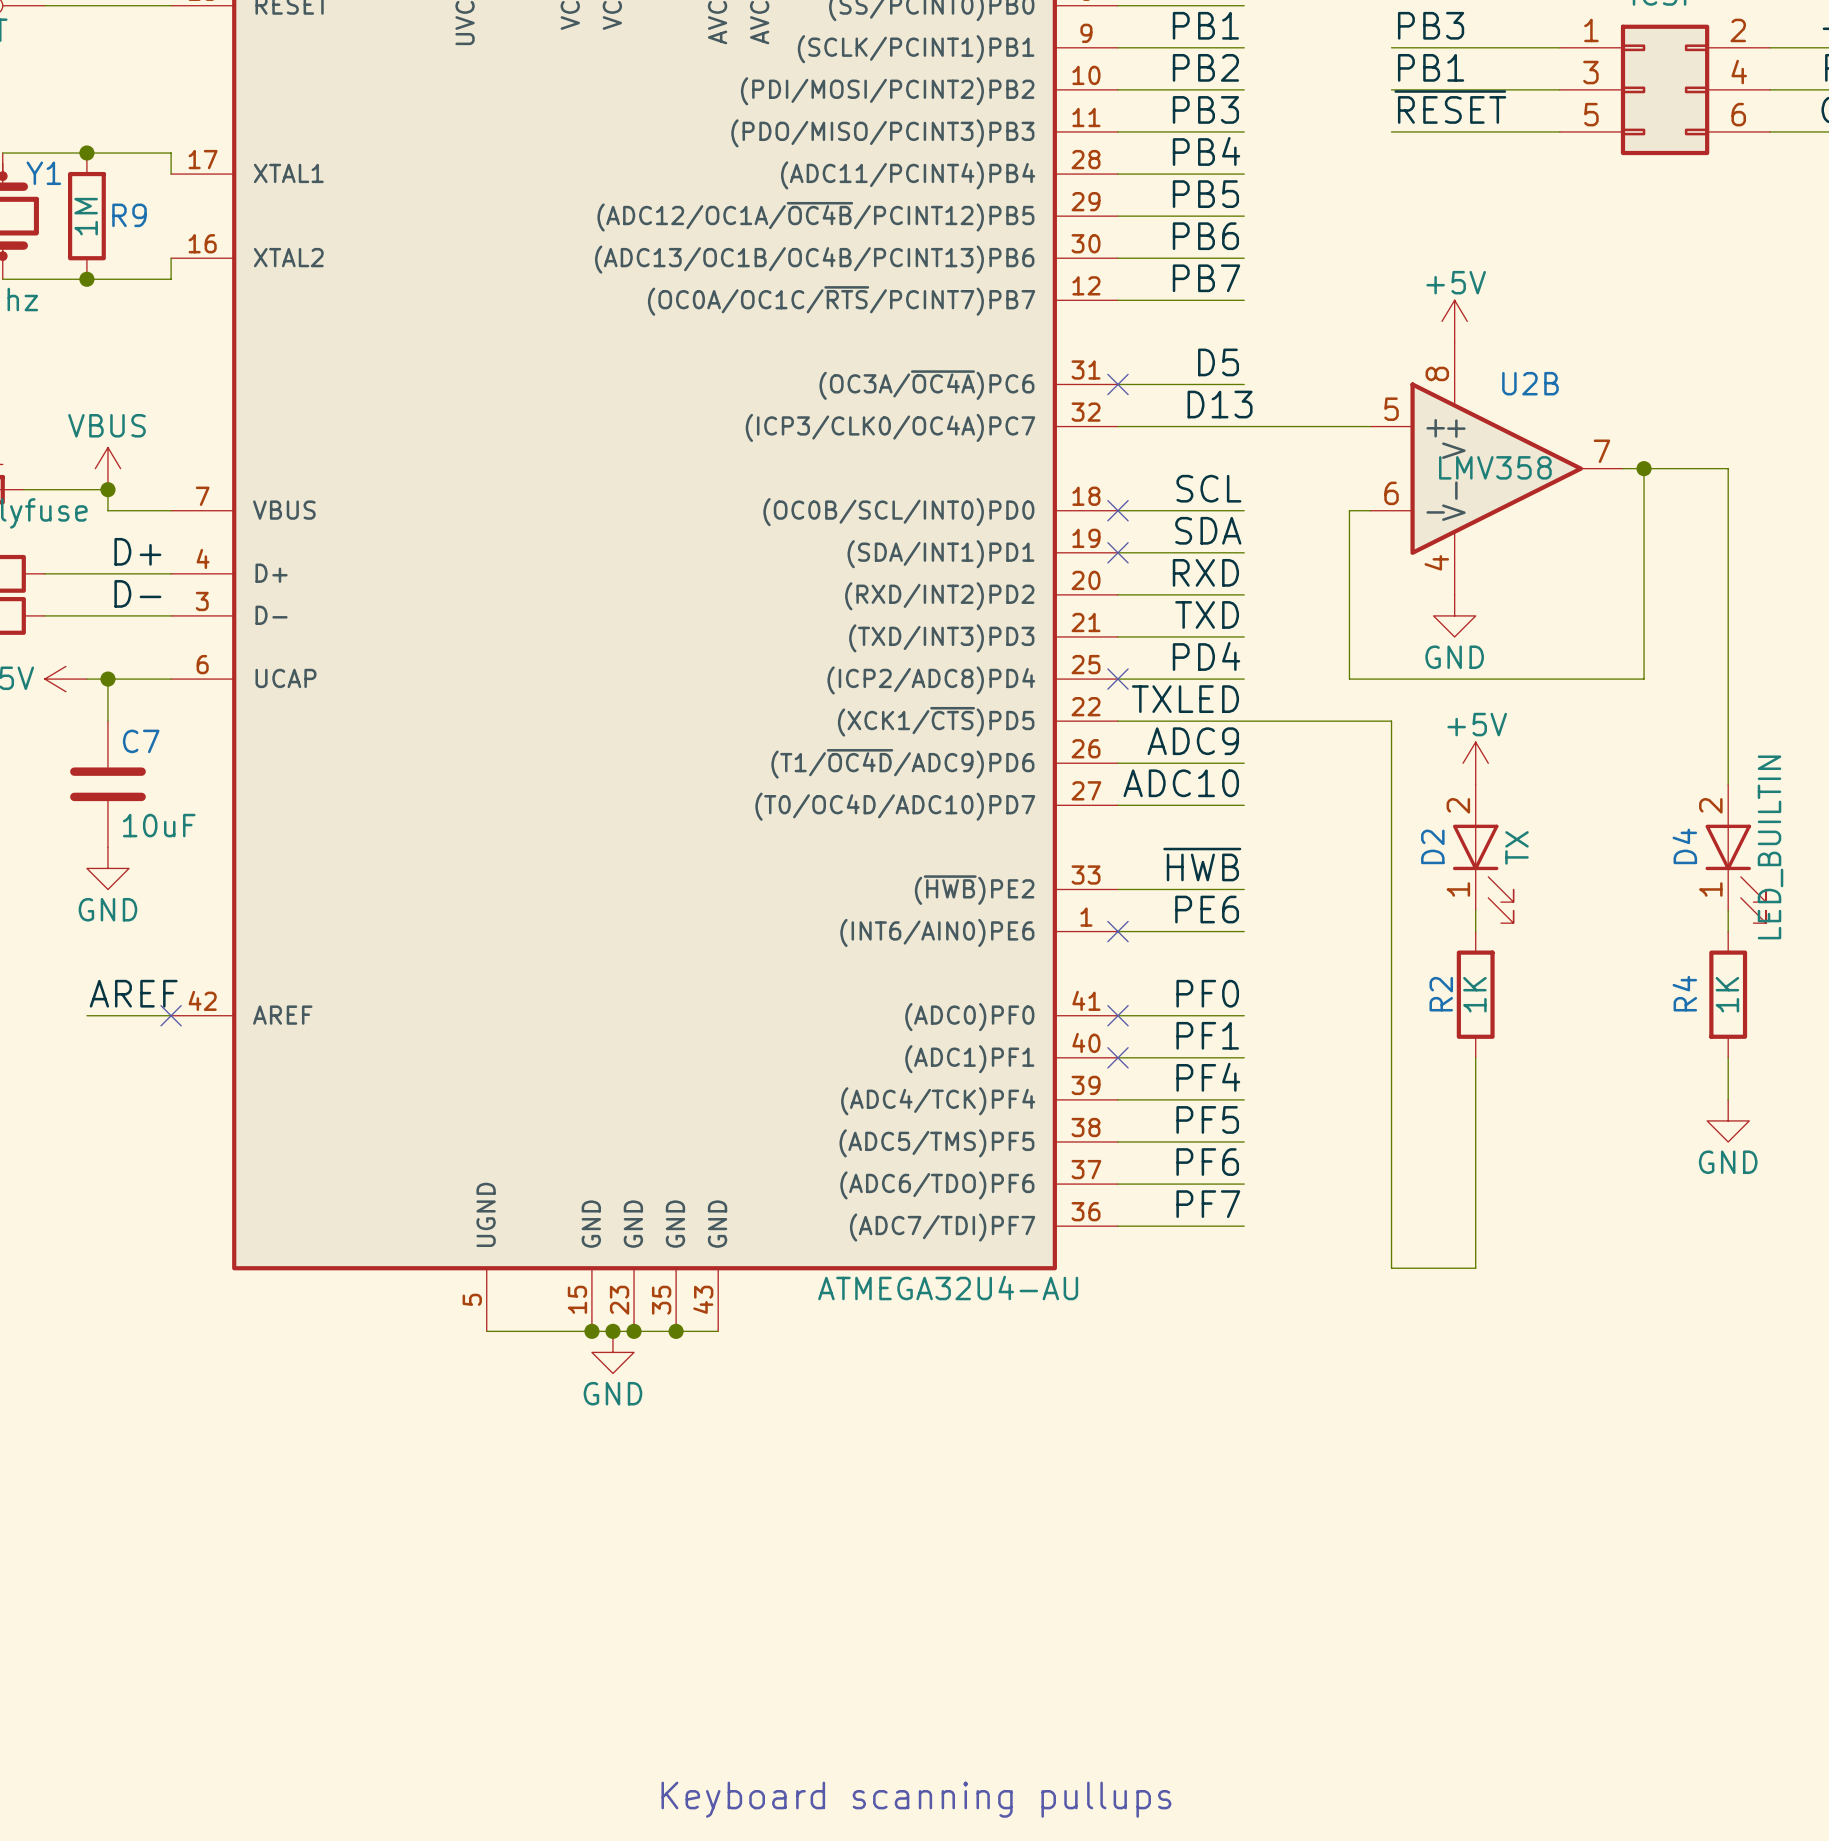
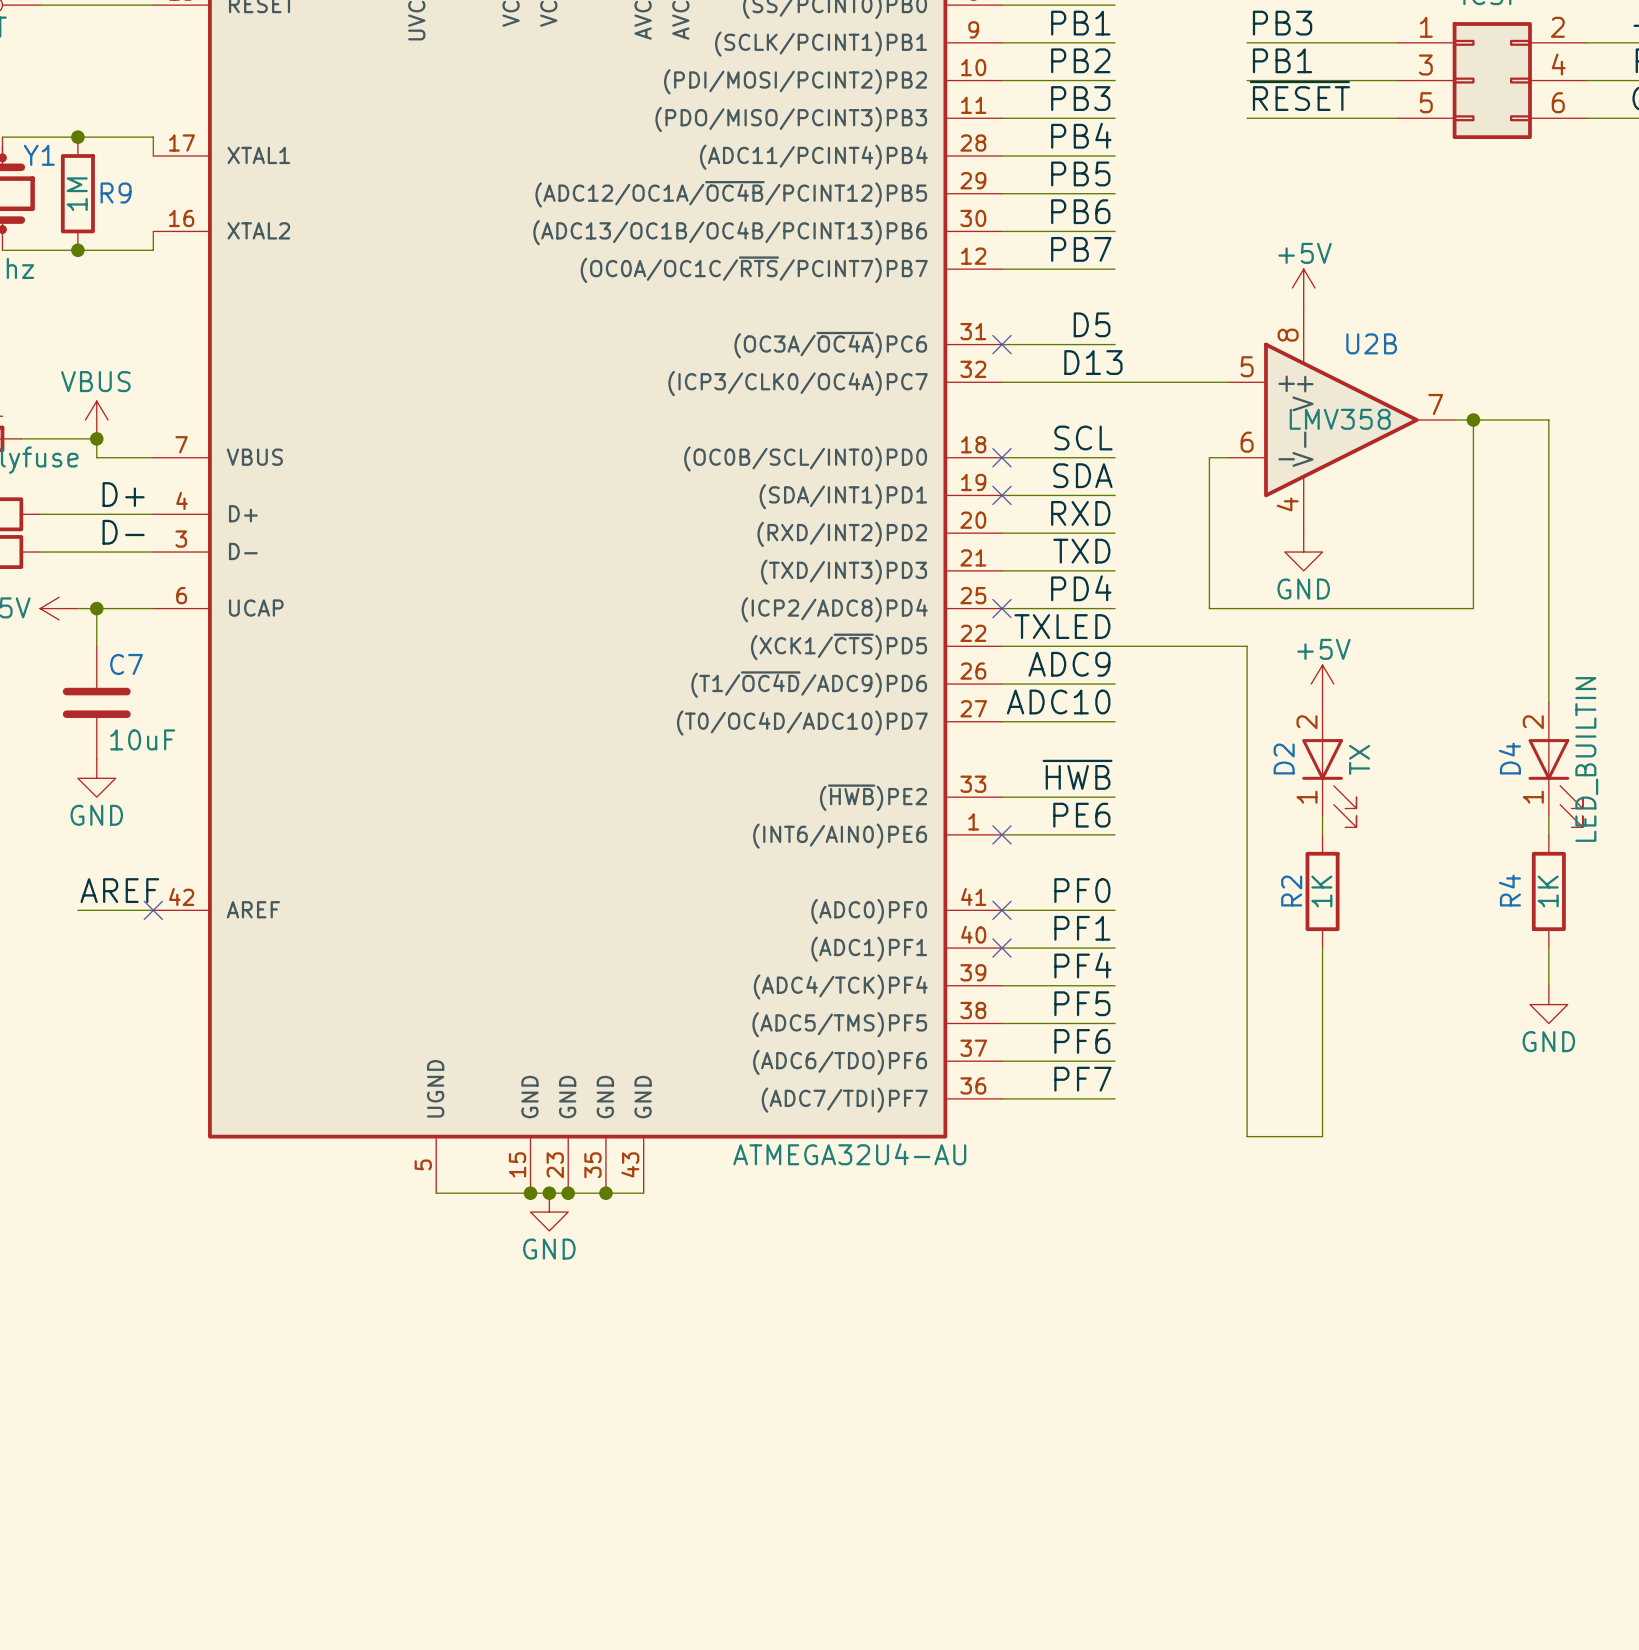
text: Keyboard scanning pullups (916, 1799) -> none

